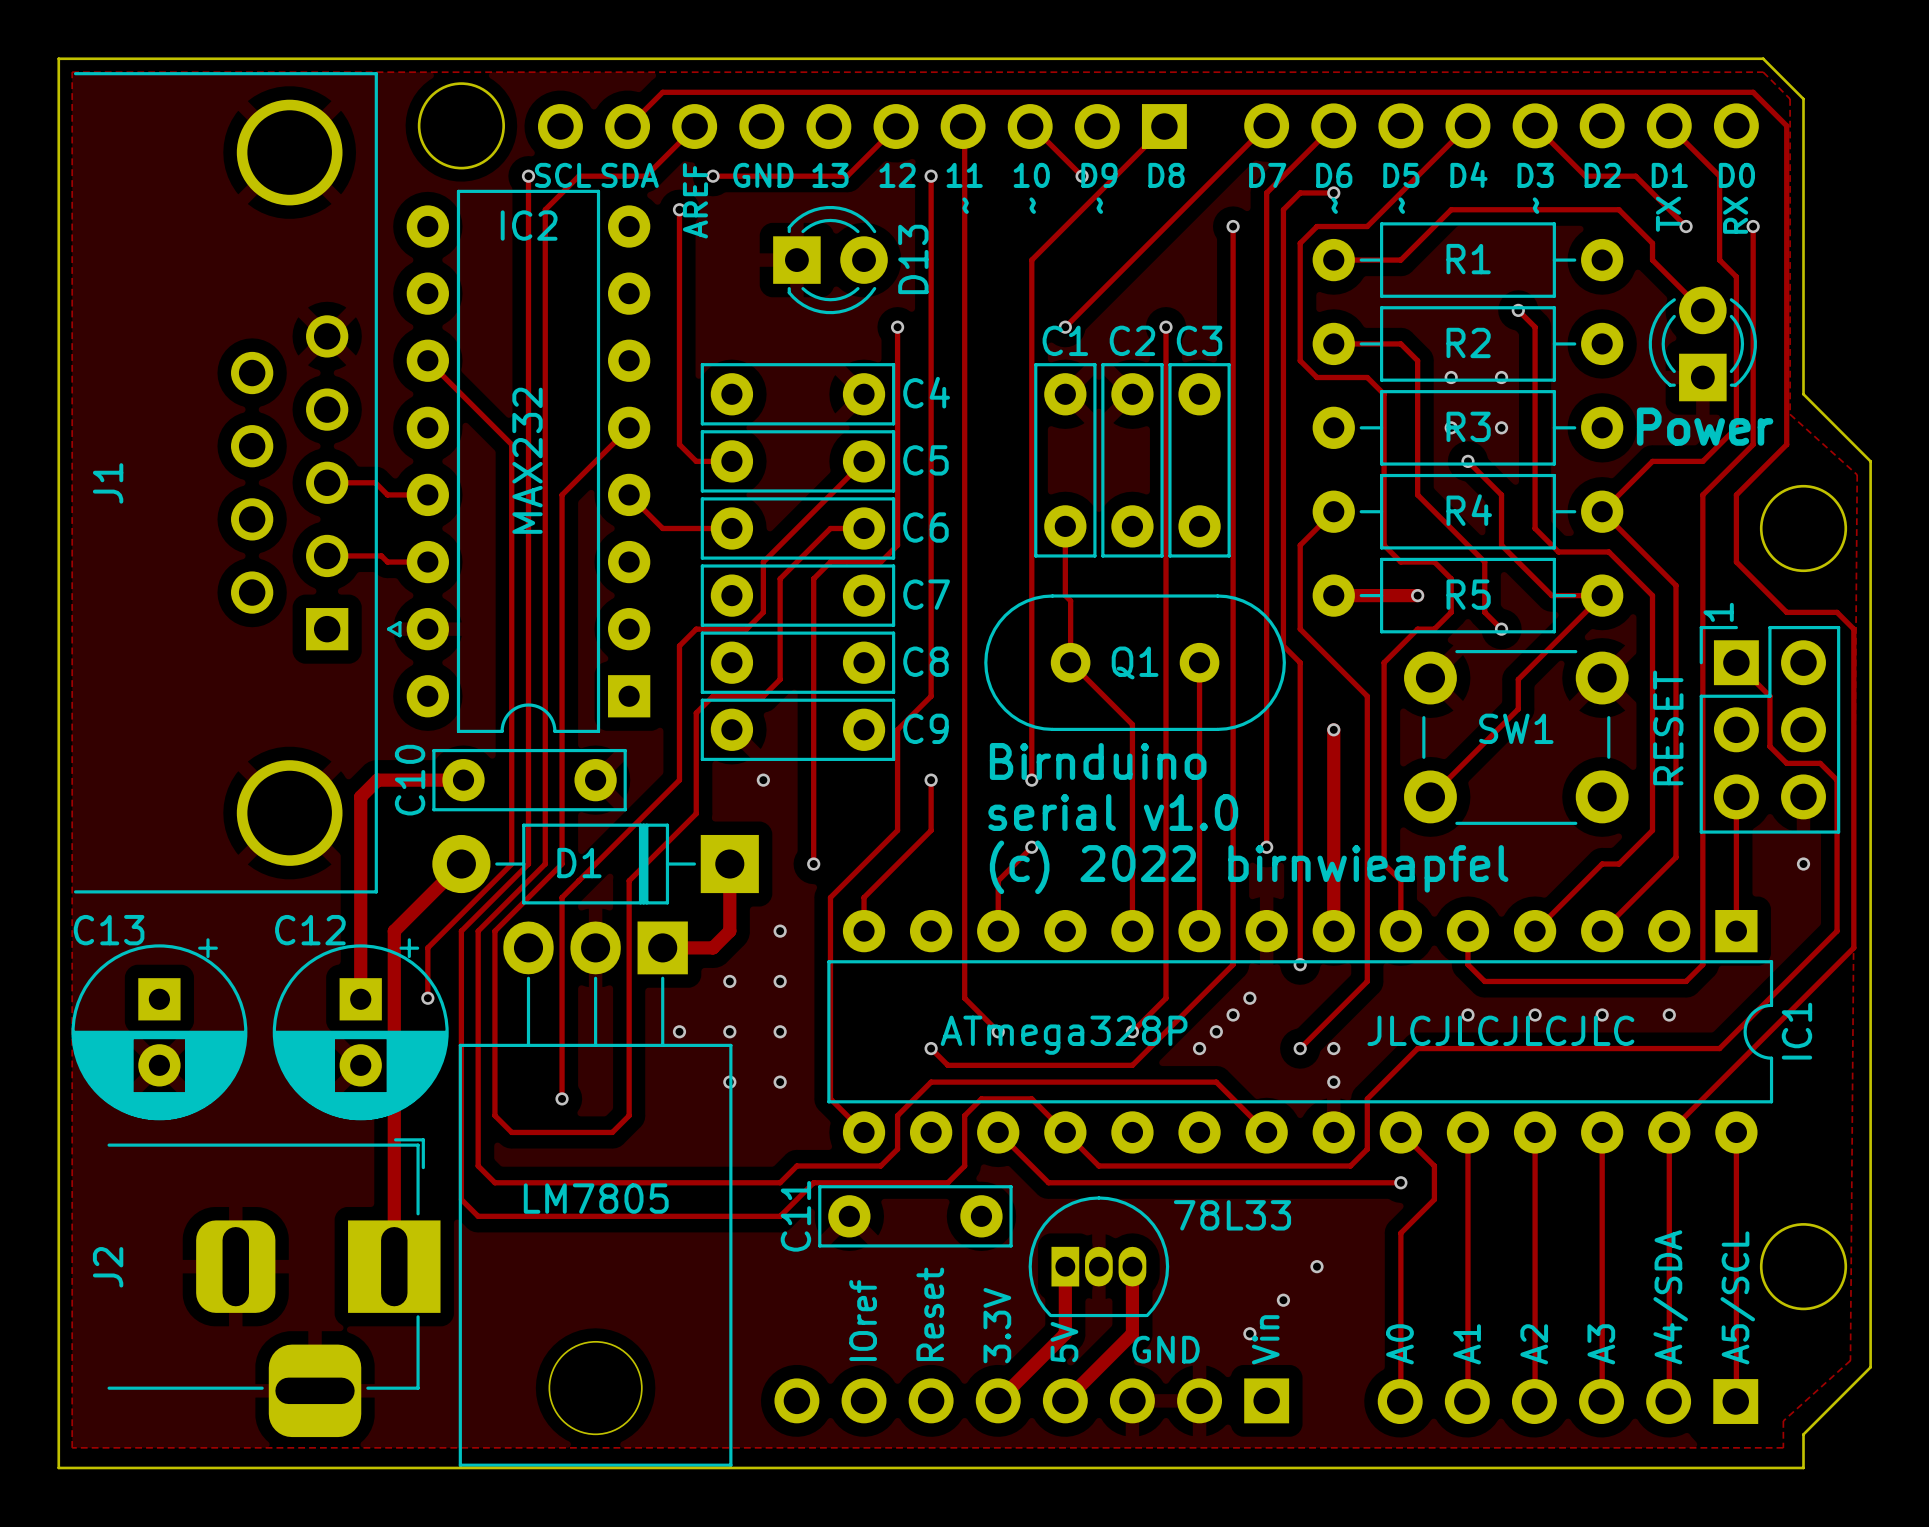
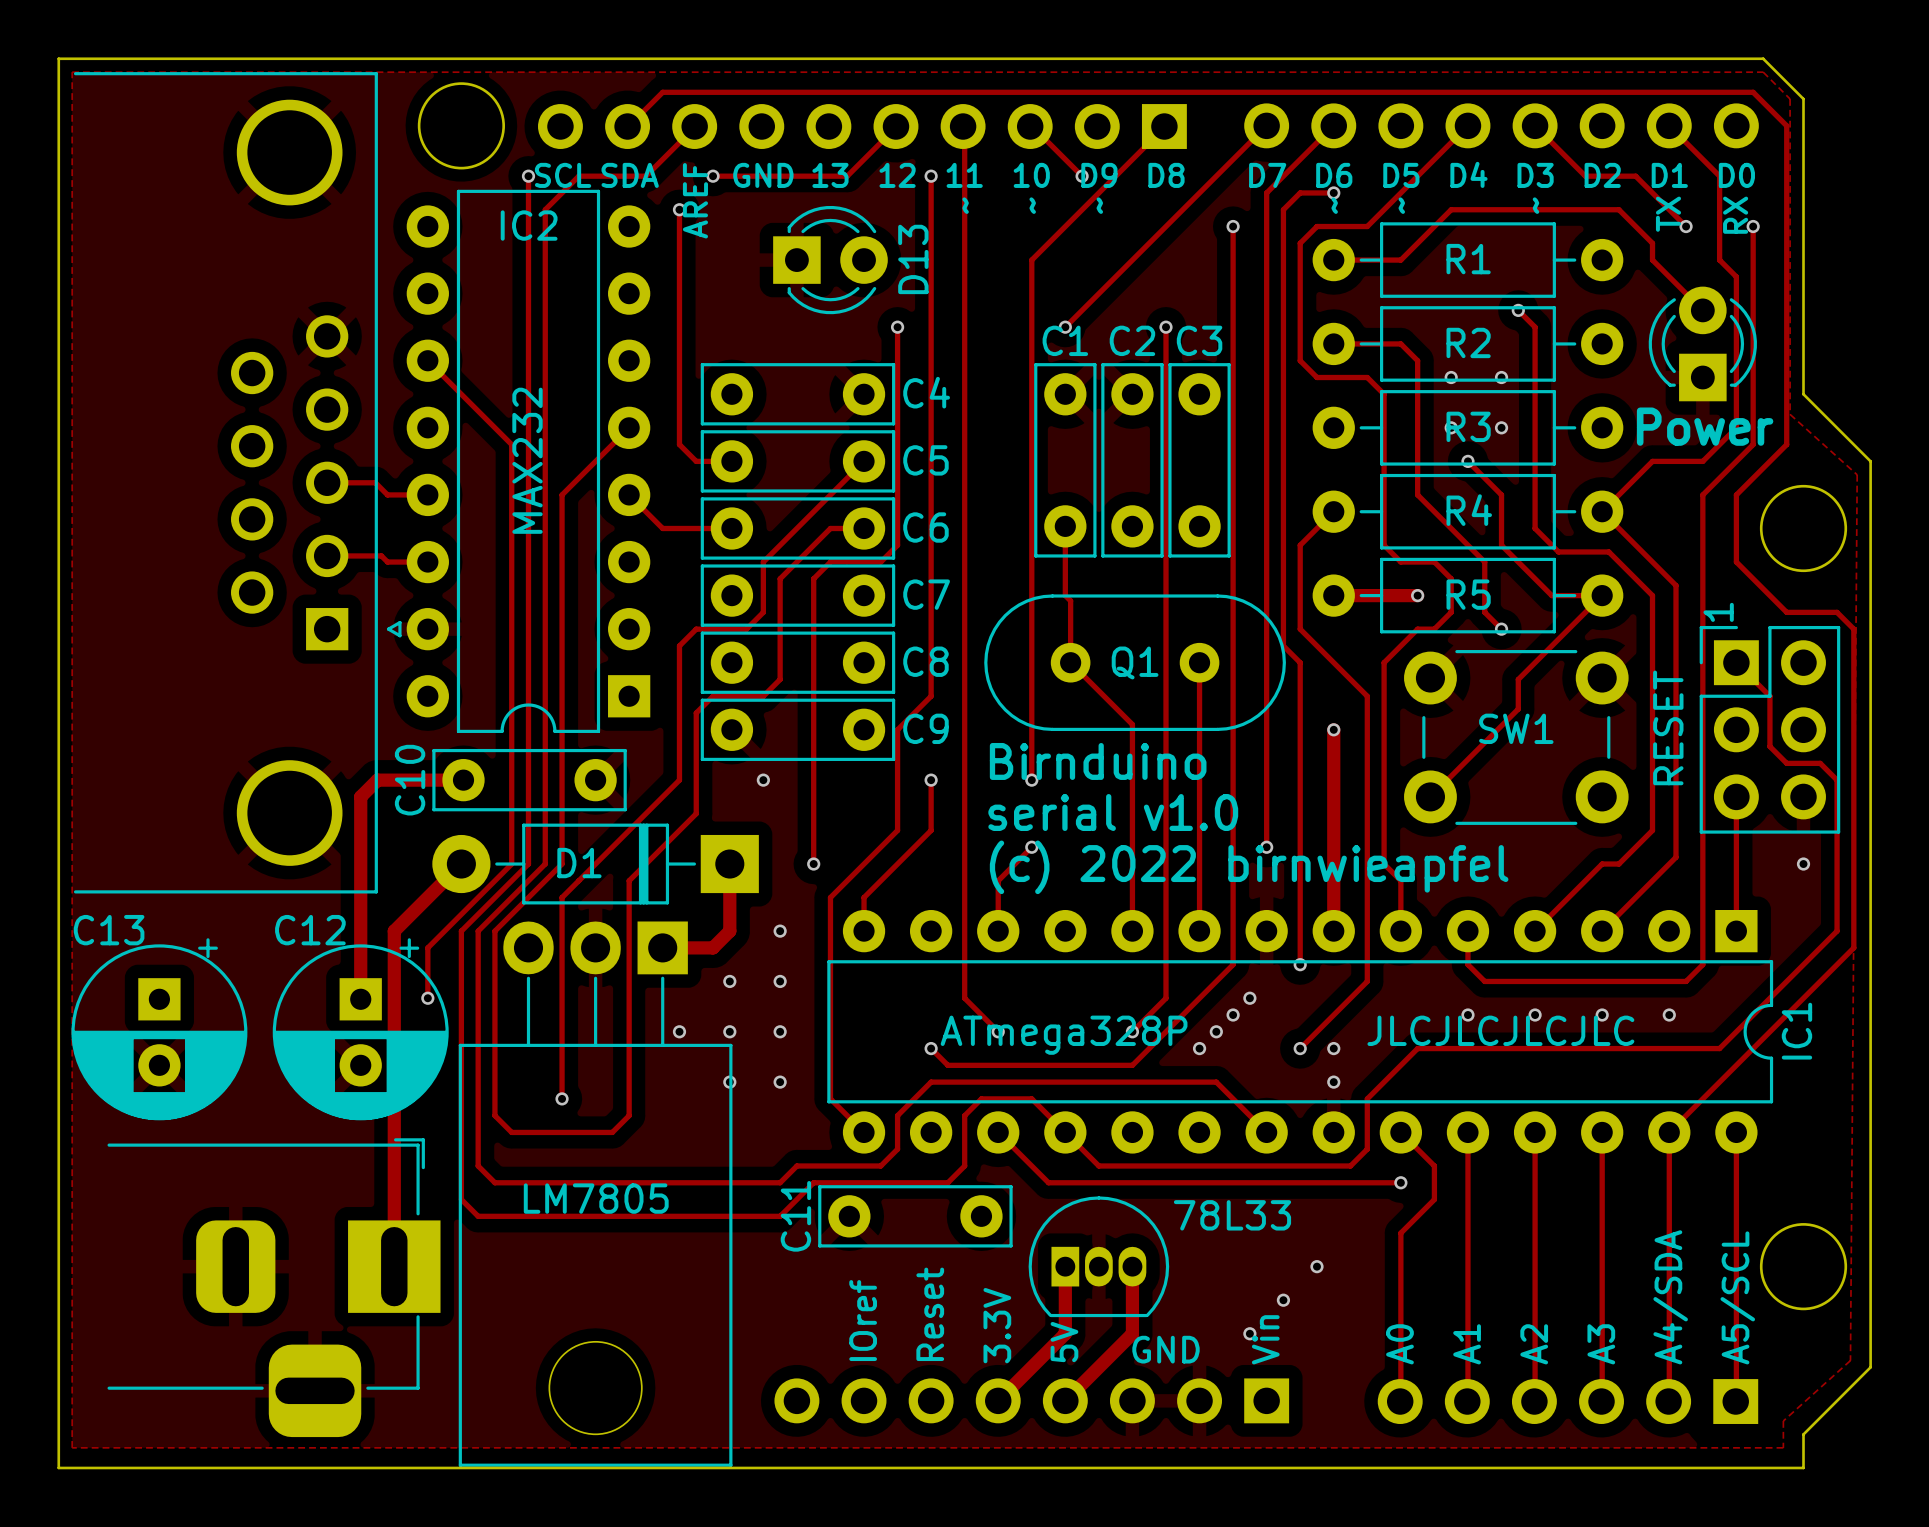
J1 name: J1 (108, 483) -> none
J2 name: J2 (108, 1267) -> none

